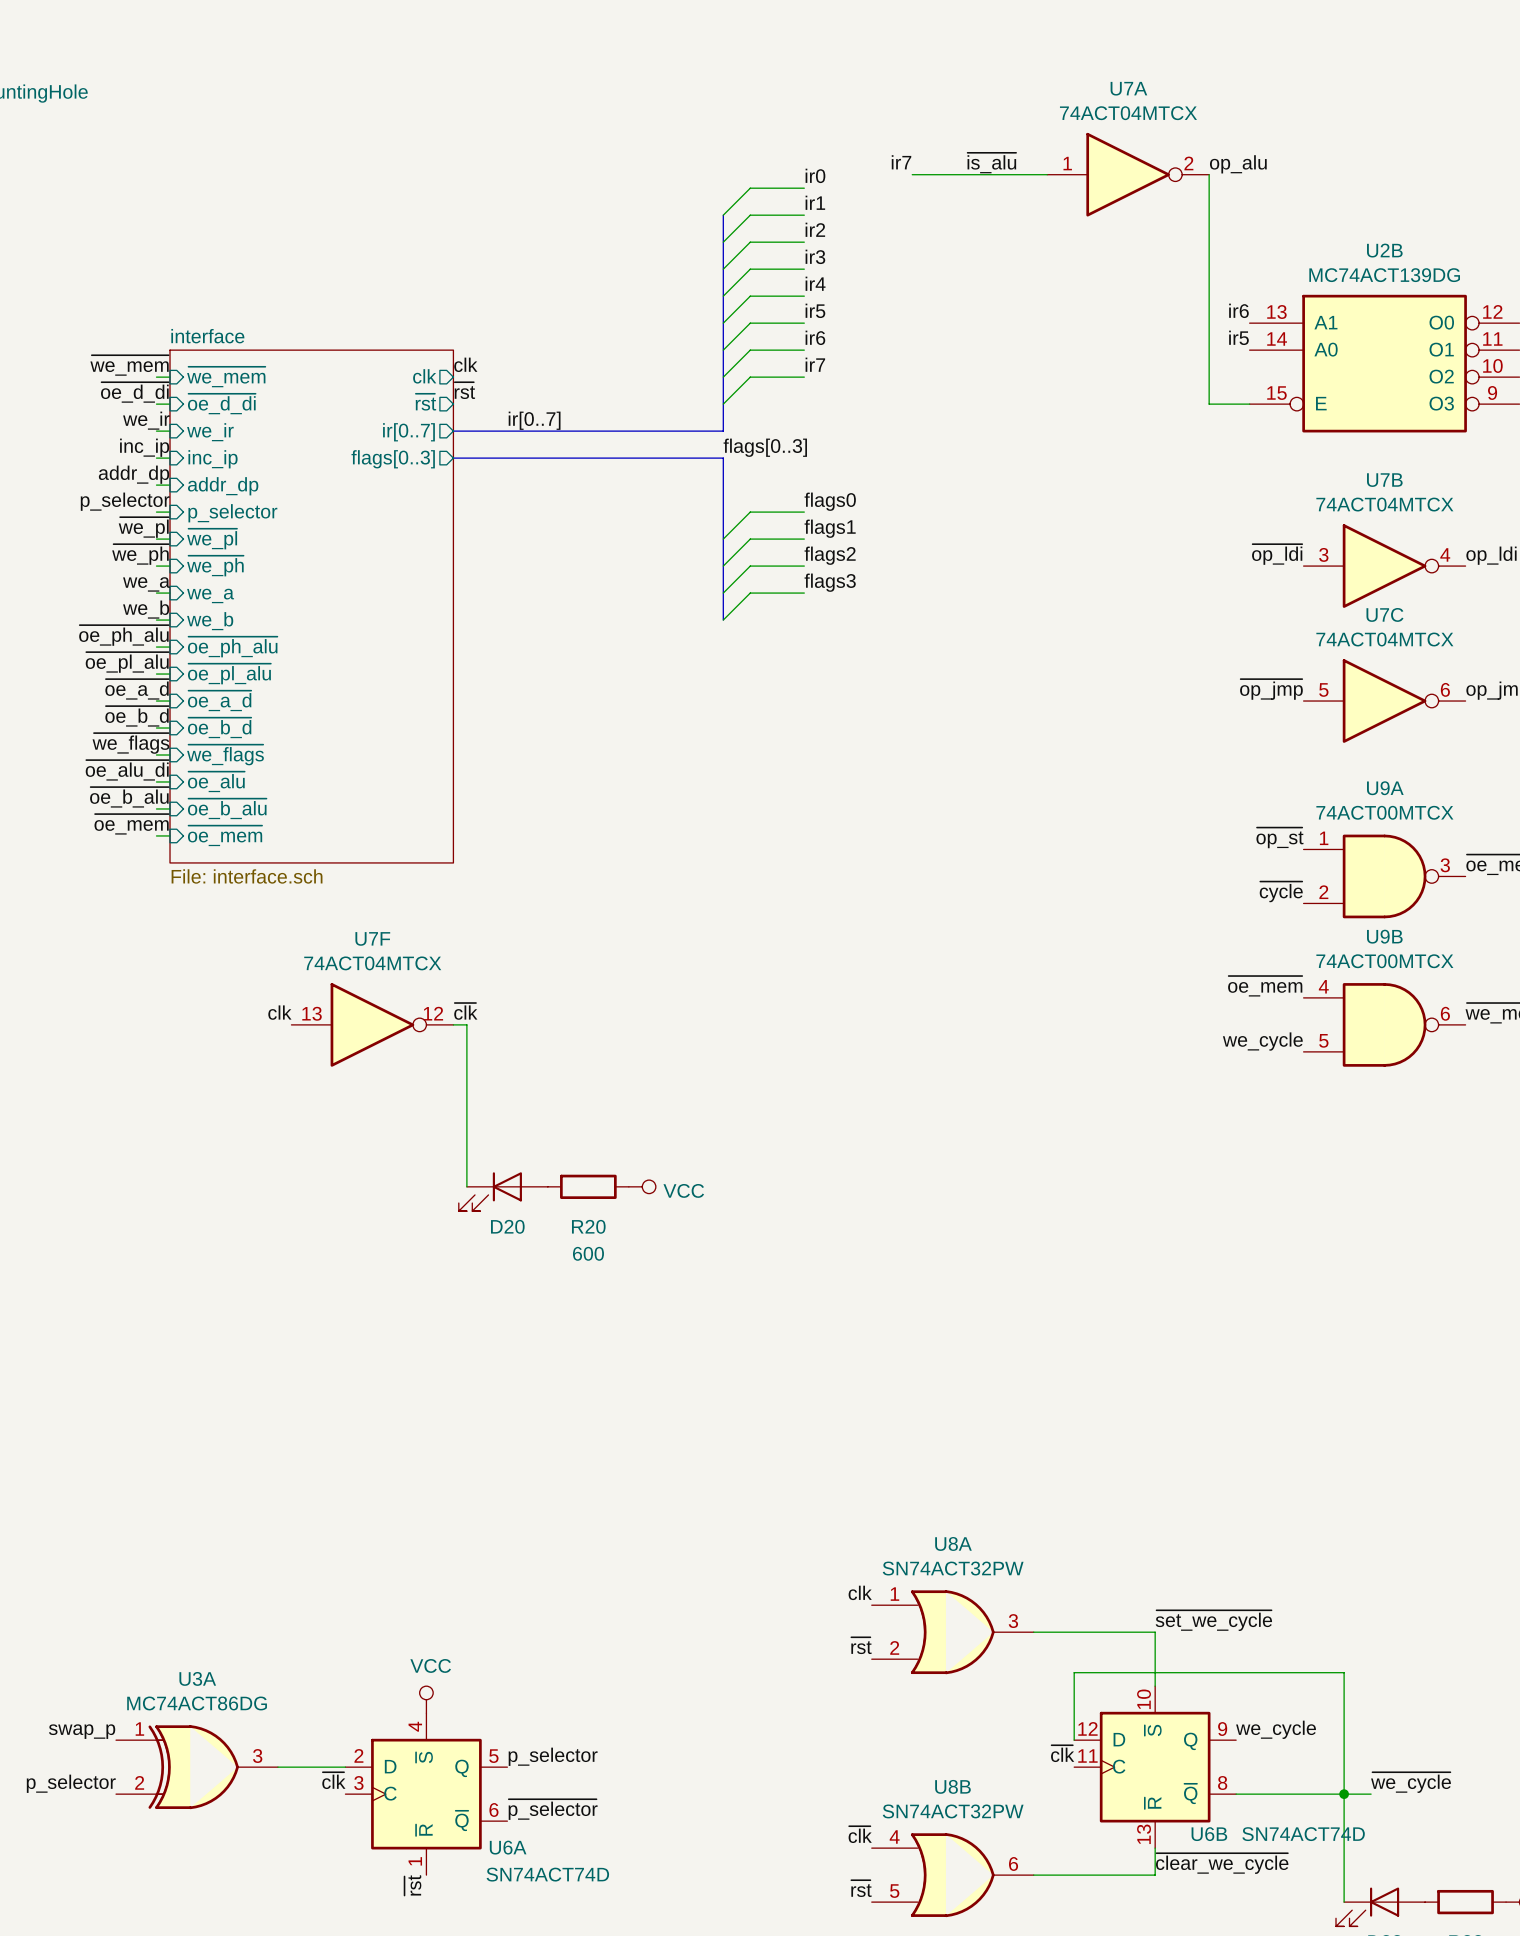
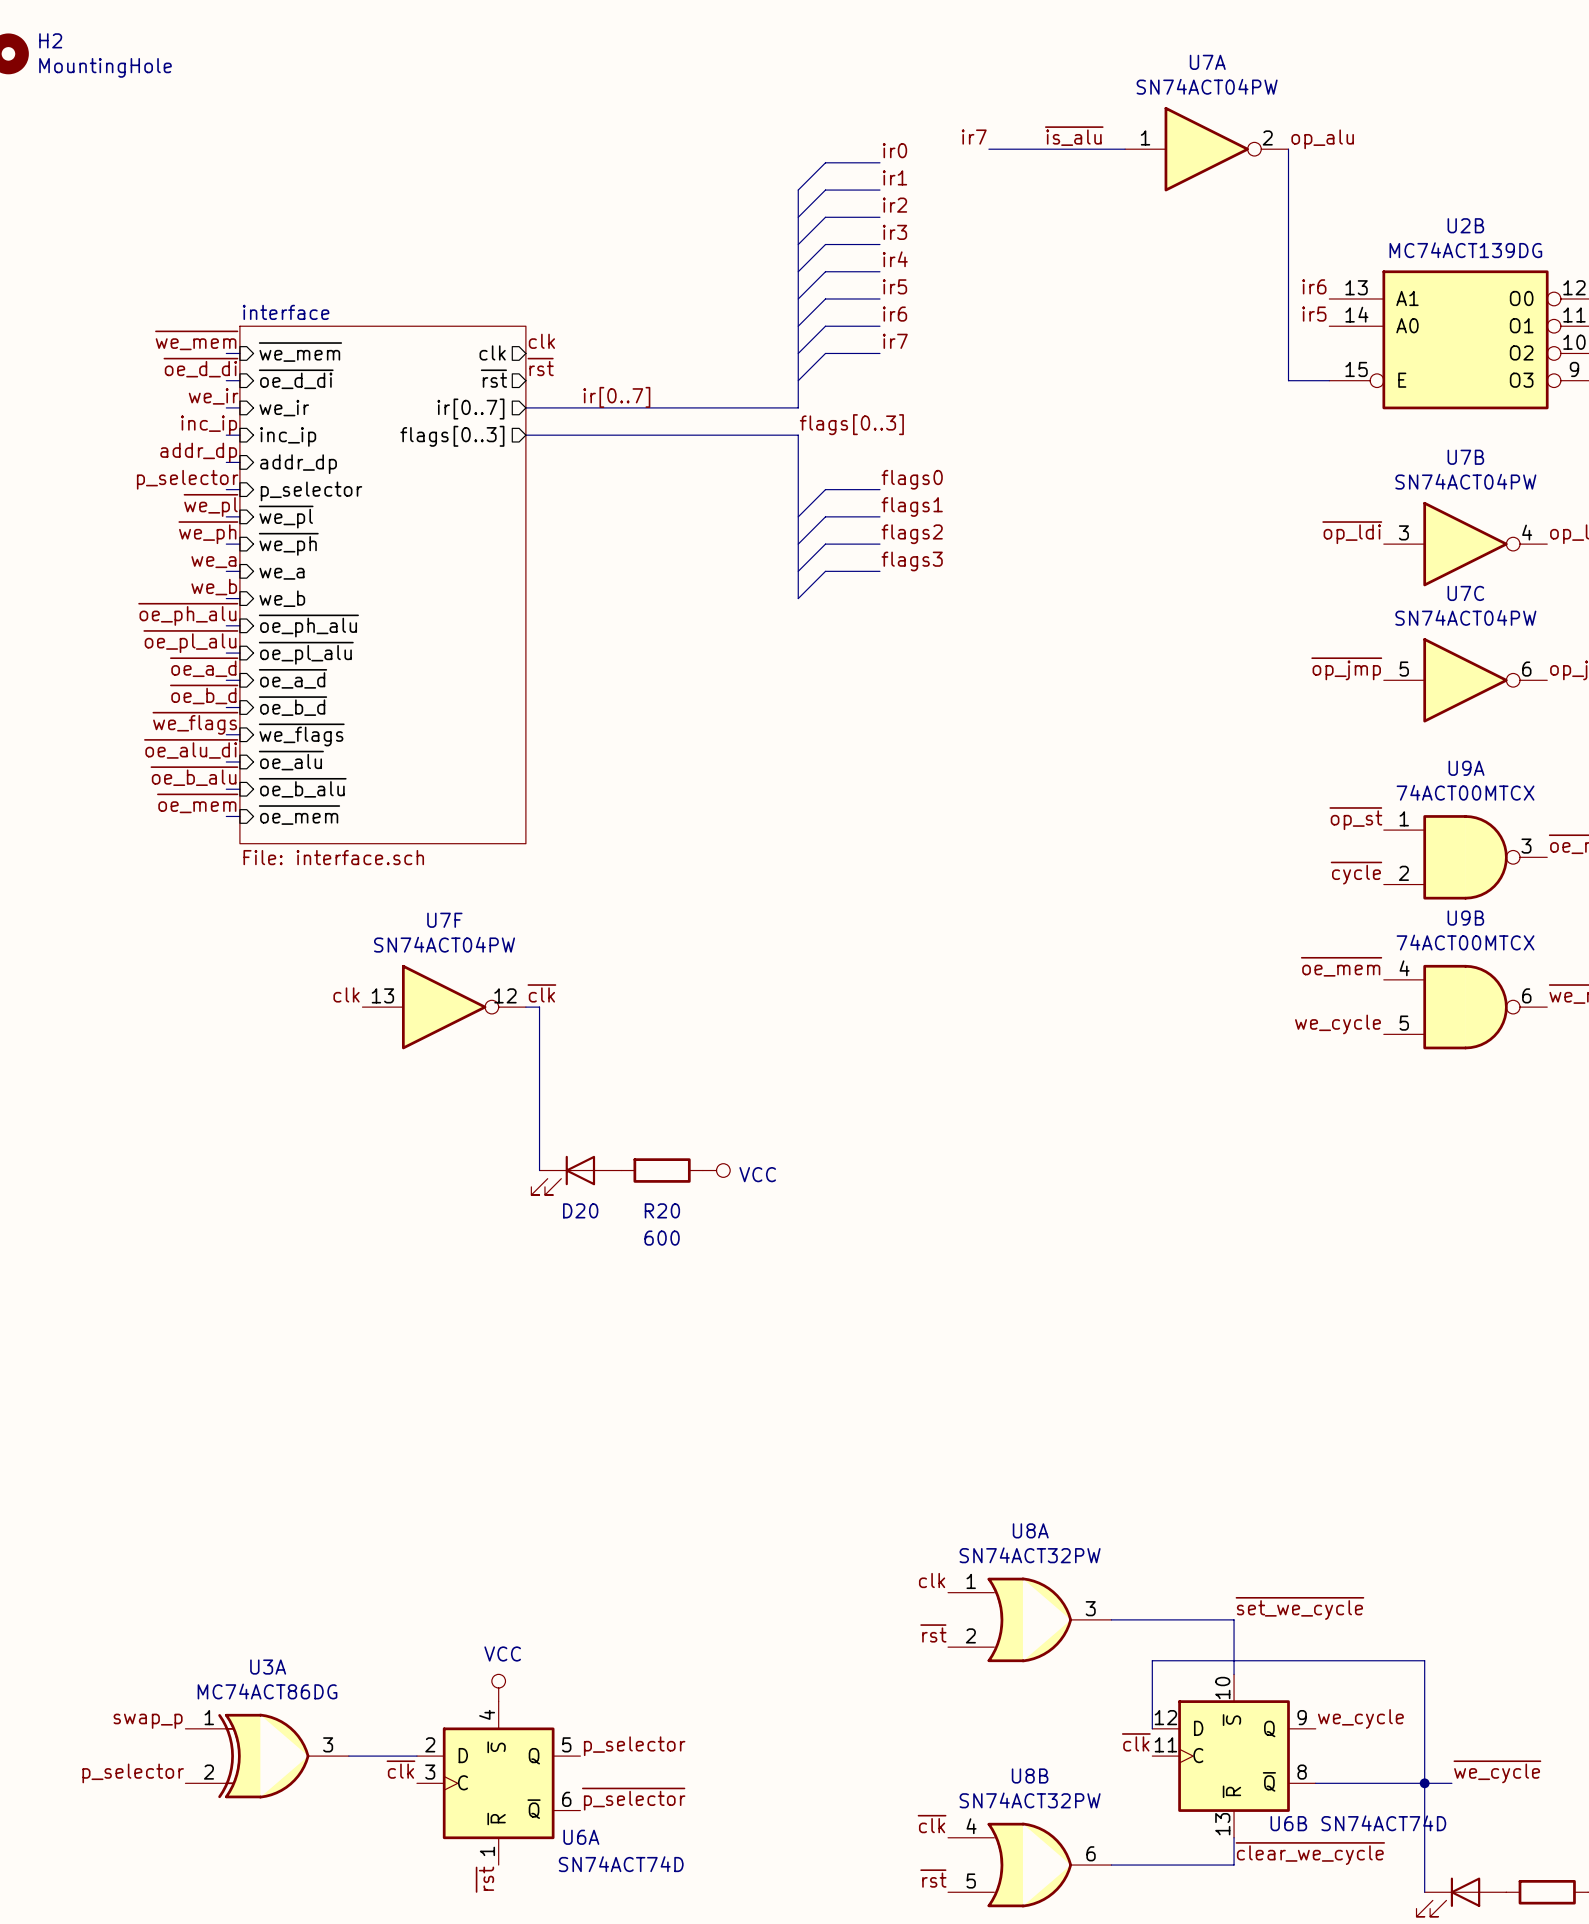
U7A value: 74ACT04MTCX (1128, 113) -> SN74ACT04PW (1207, 86)
U7B value: 74ACT04MTCX (1384, 504) -> SN74ACT04PW (1465, 481)
U7C value: 74ACT04MTCX (1384, 639) -> SN74ACT04PW (1465, 617)
U7F value: 74ACT04MTCX (372, 963) -> SN74ACT04PW (444, 944)

